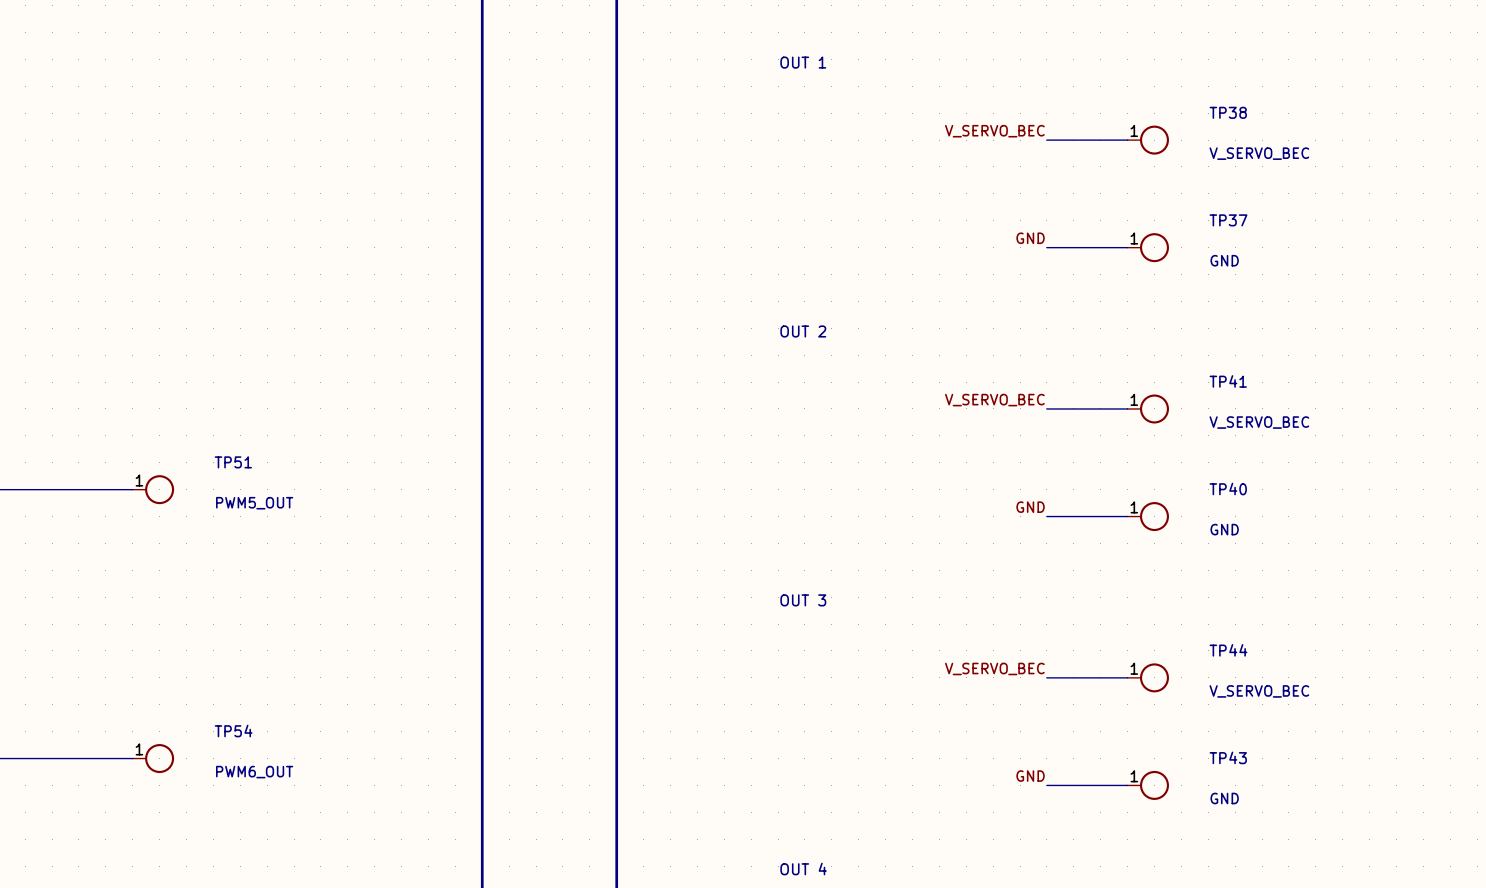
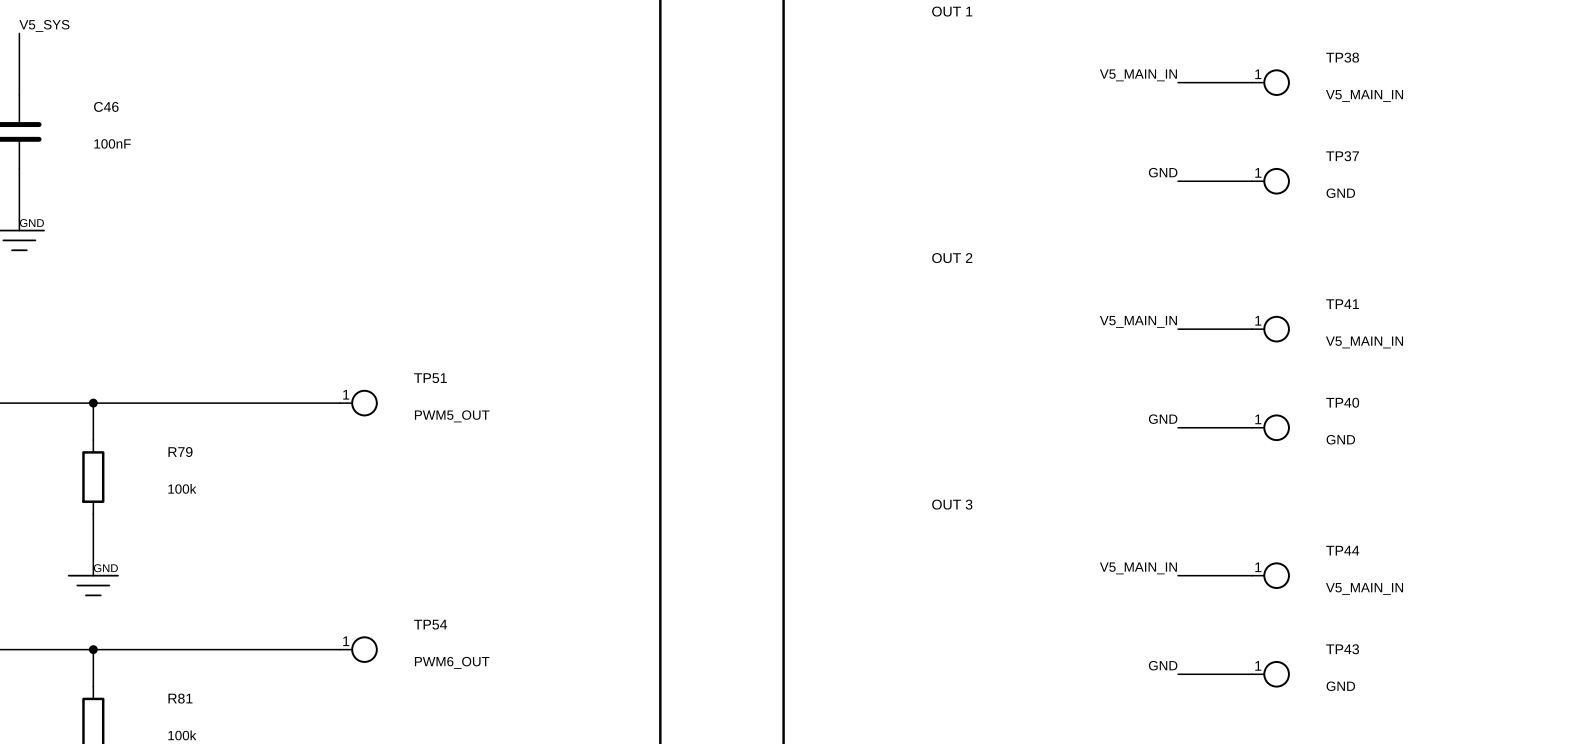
label: V_SERVO_BEC (994, 131) -> V5_MAIN_IN (1138, 75)
TP38 value: V_SERVO_BEC (1259, 153) -> V5_MAIN_IN (1364, 95)
label: V_SERVO_BEC (994, 400) -> V5_MAIN_IN (1138, 321)
TP41 value: V_SERVO_BEC (1259, 422) -> V5_MAIN_IN (1364, 342)
label: V_SERVO_BEC (994, 668) -> V5_MAIN_IN (1138, 568)
TP44 value: V_SERVO_BEC (1259, 691) -> V5_MAIN_IN (1364, 588)

